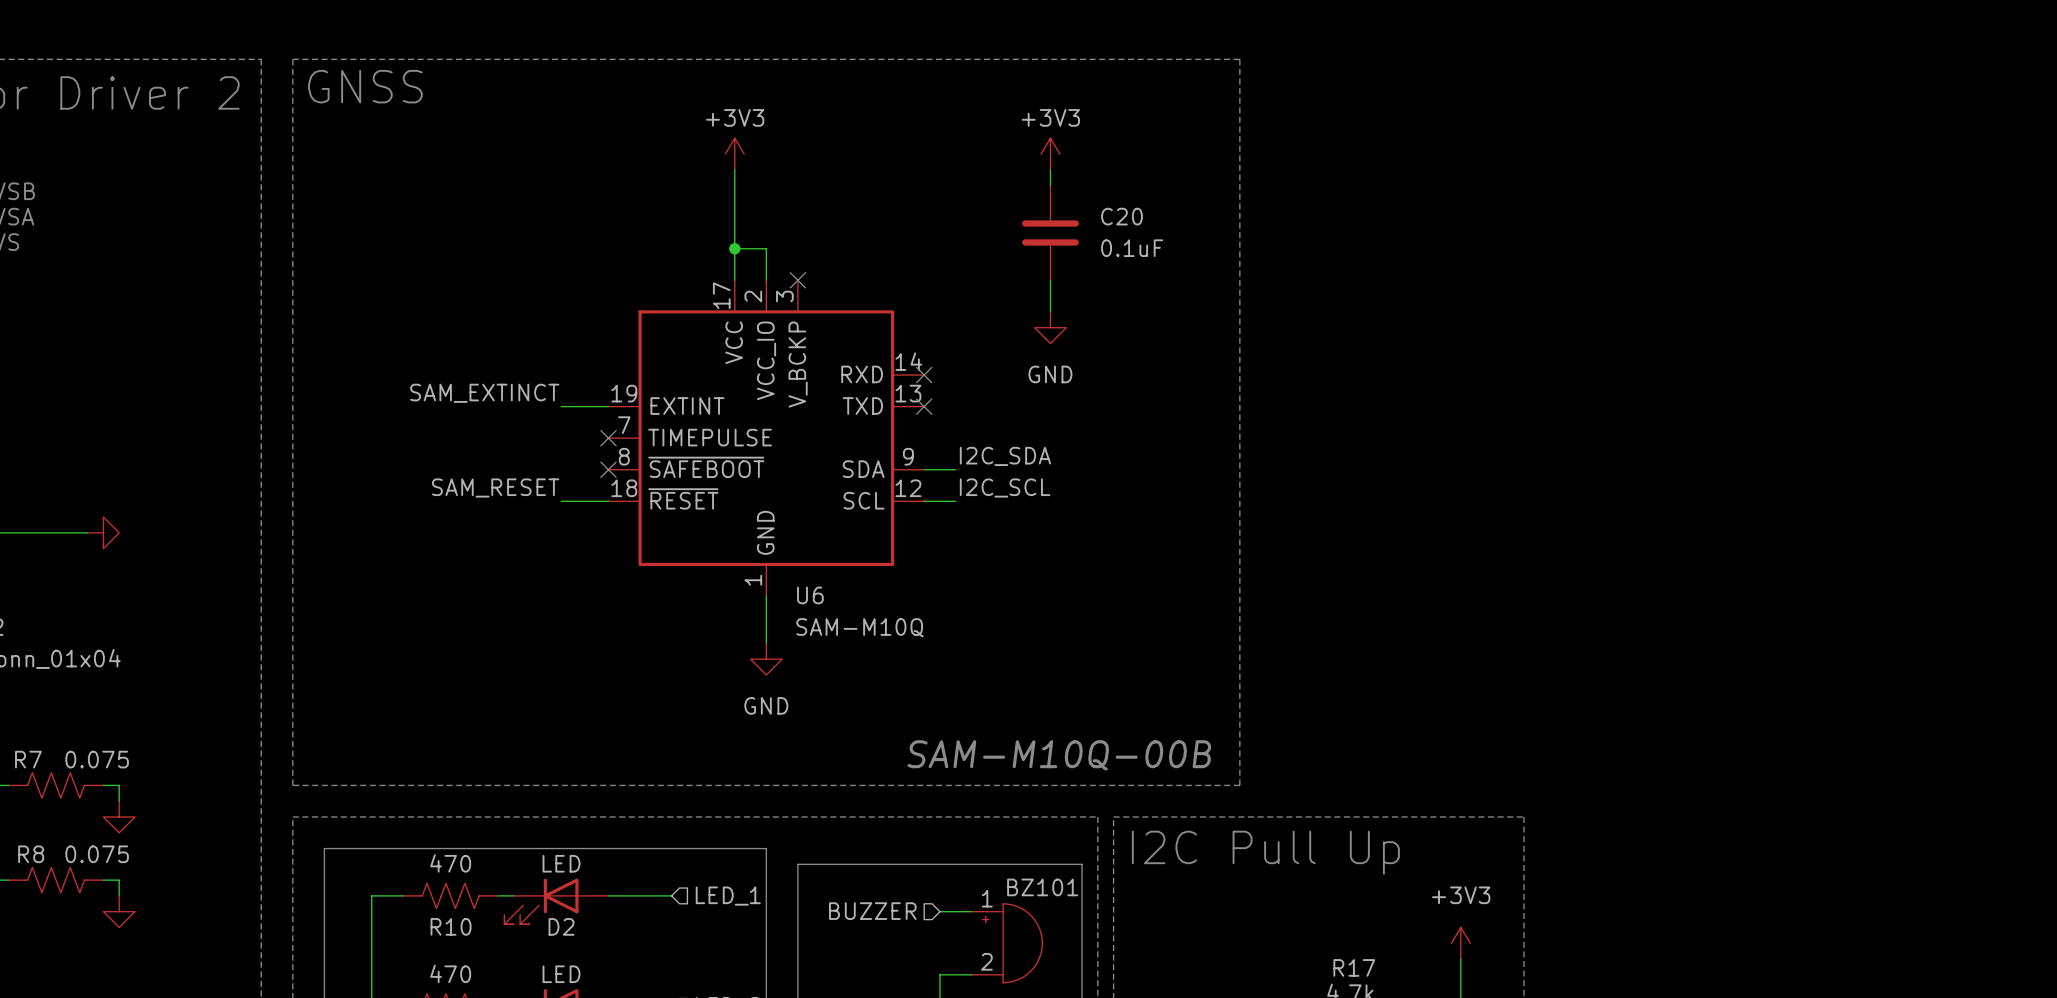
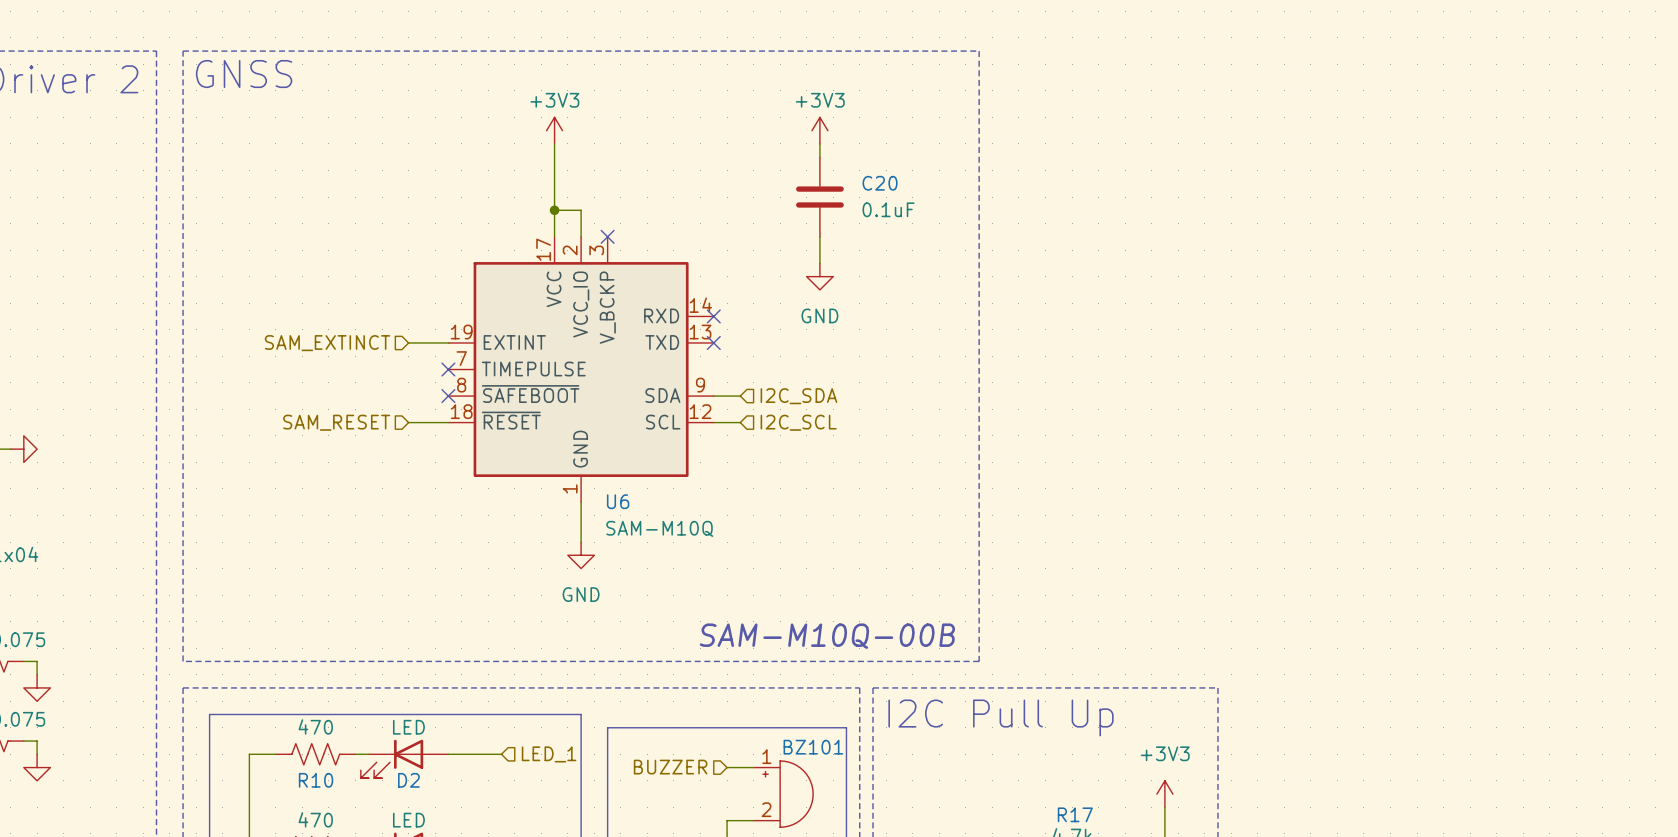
label: SAM_EXTINCT (484, 393) -> none
hierarchical label: none -> SAM_EXTINCT (327, 343)
label: I2C_SDA (1005, 456) -> none
hierarchical label: none -> I2C_SDA (798, 396)
label: SAM_RESET (495, 487) -> none
label: I2C_SCL (1005, 487) -> none
hierarchical label: none -> SAM_RESET (336, 422)
hierarchical label: none -> I2C_SCL (798, 422)

